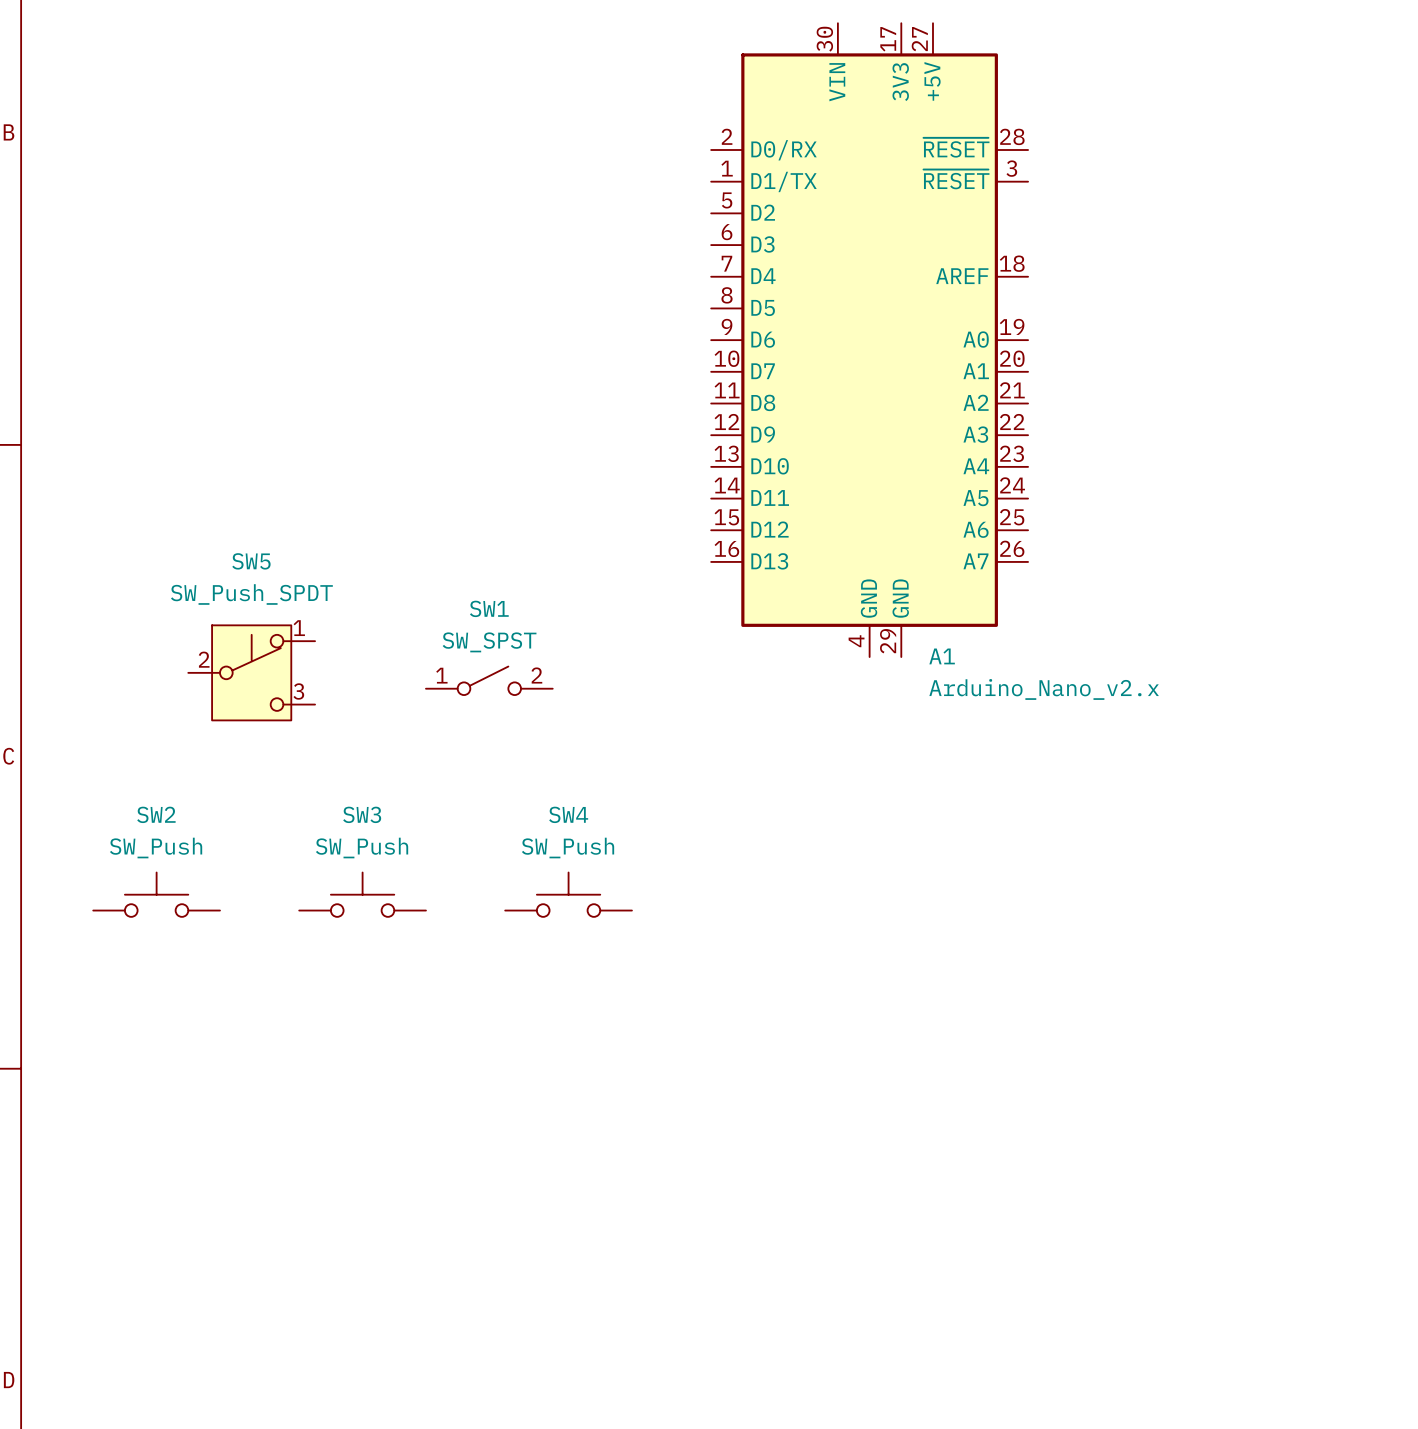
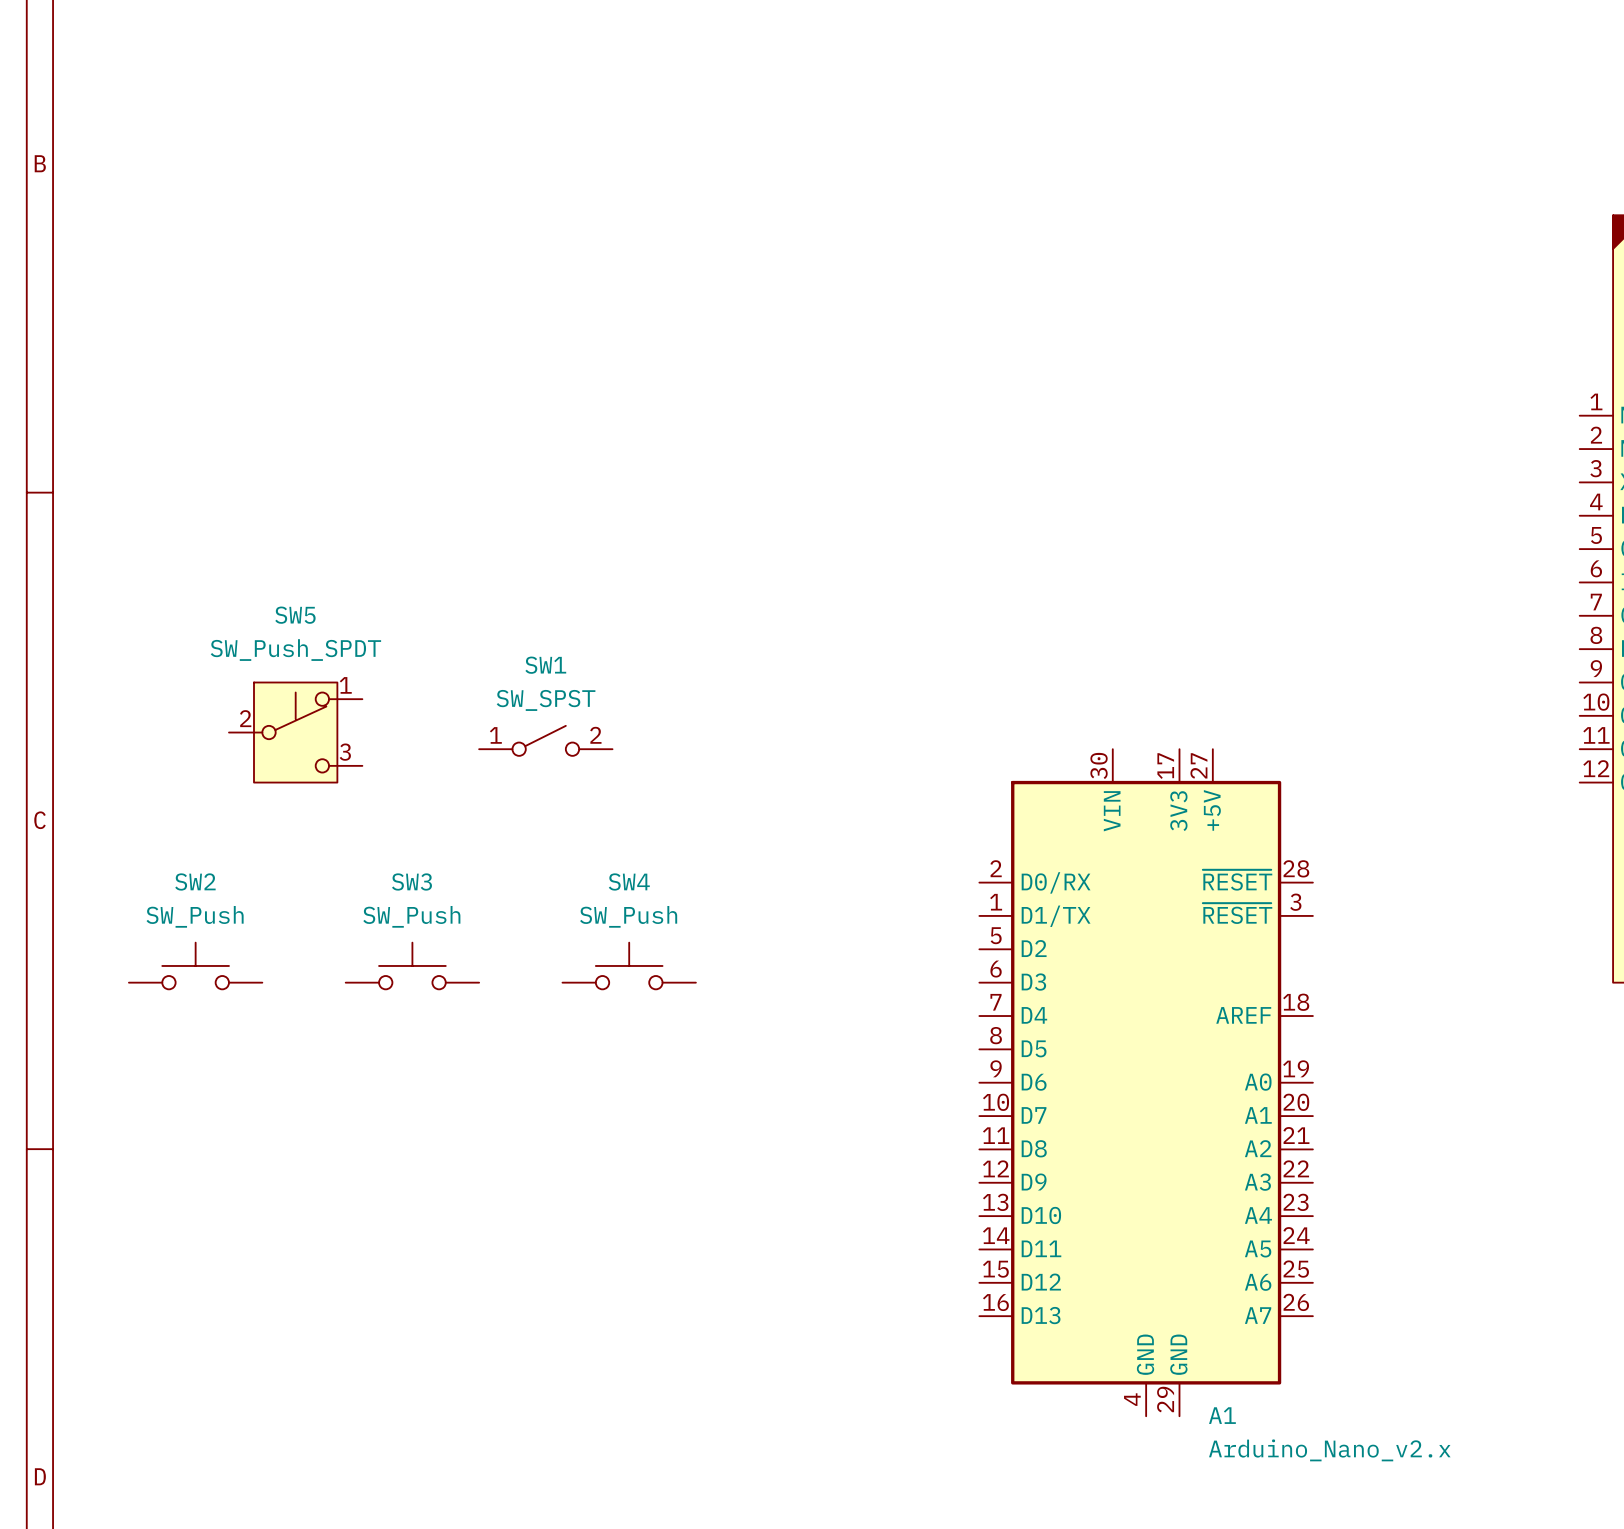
A1 position: (869, 340) -> (1146, 1082)

